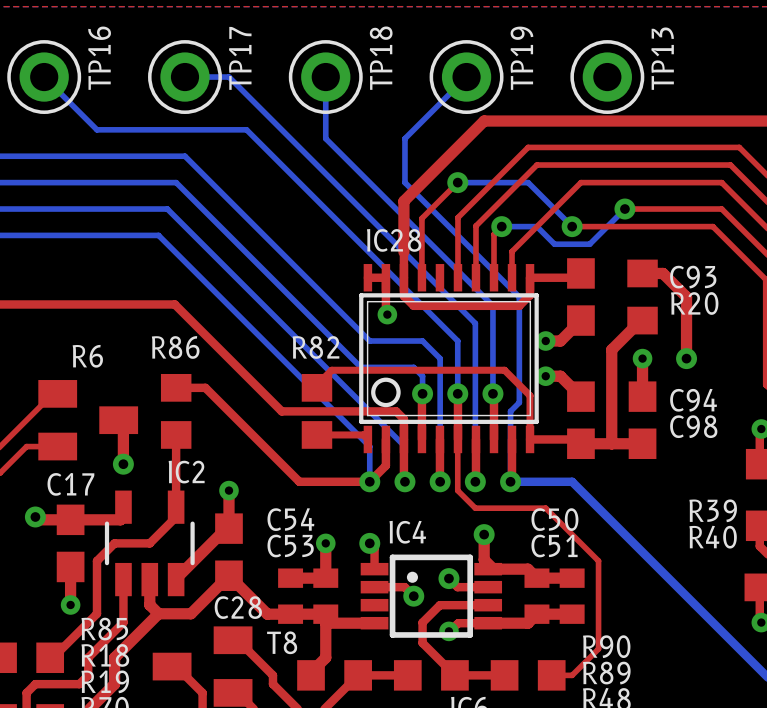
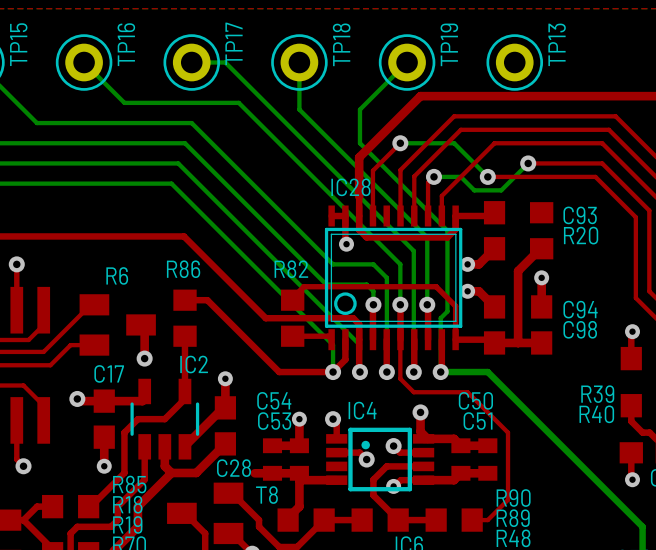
top track: (642, 273) (662, 273) (686, 297) (686, 358) -> none
via: (686, 358) -> none
top track: (228, 575) (267, 614) -> none

